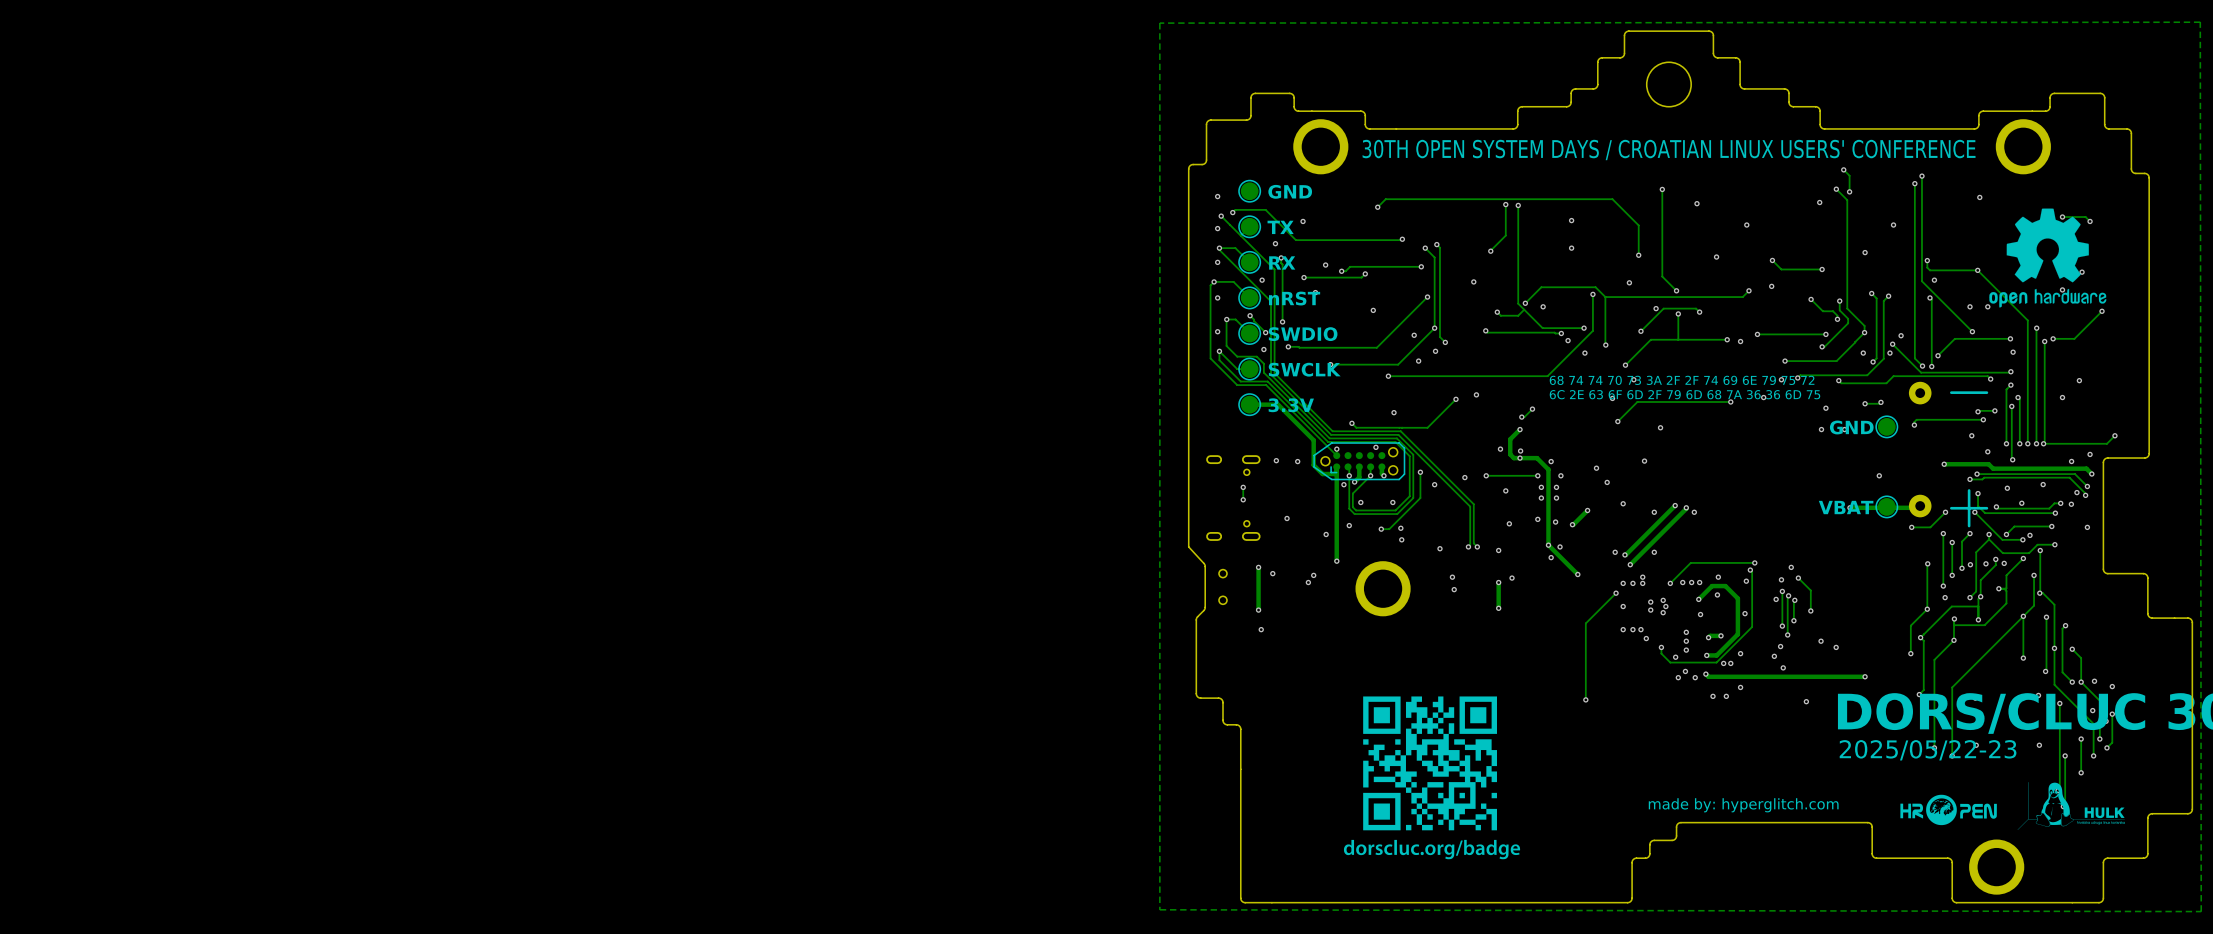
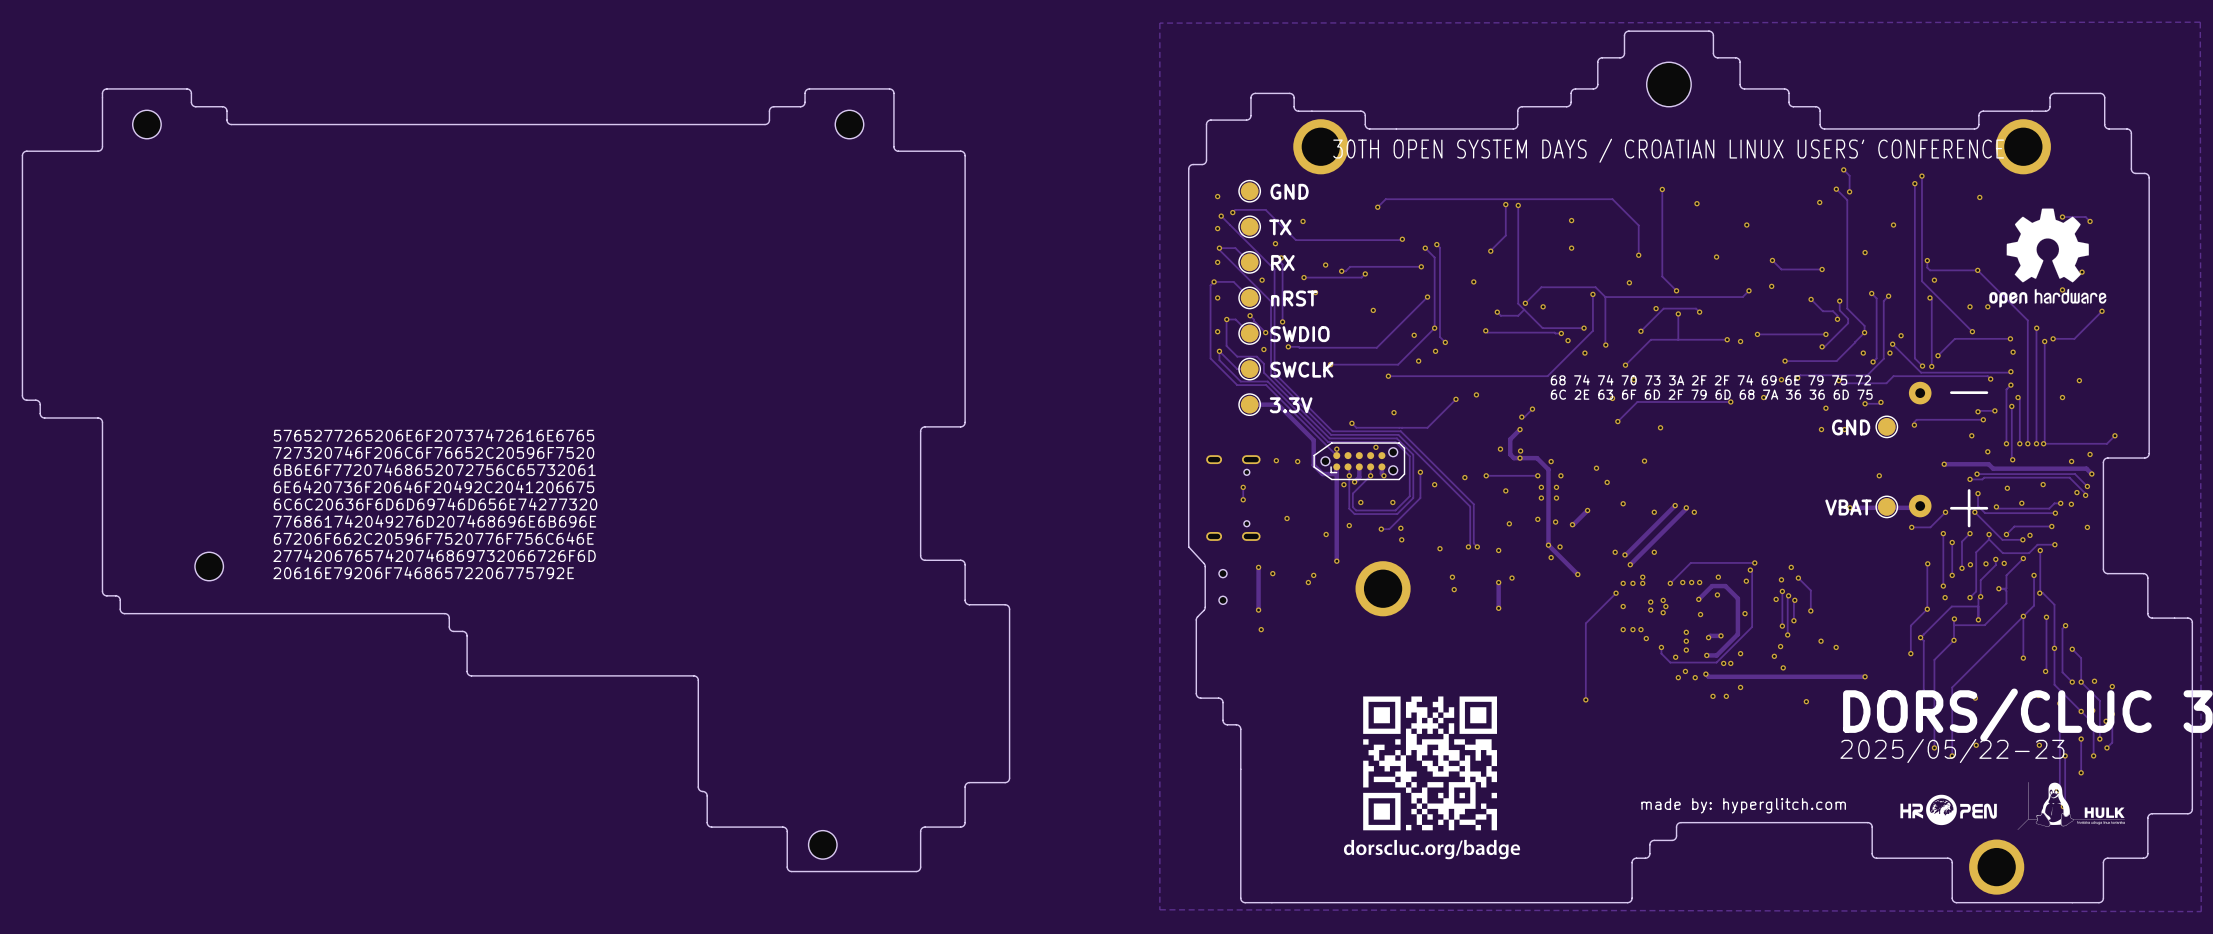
board edge: none -> (889, 88) (808, 89) (805, 92) (803, 105) (772, 107) (769, 110) (769, 121) (765, 124) (231, 124) (227, 121) (226, 110) (224, 107) (193, 105) (191, 92) (188, 89) (104, 89) (102, 92) (102, 146) (100, 150) (26, 151) (22, 155) (22, 396) (25, 400) (38, 401) (40, 414) (43, 417) (98, 417) (102, 420) (103, 593) (118, 597) (120, 610) (124, 613) (446, 613) (449, 616) (450, 630) (463, 631) (466, 634) (467, 672) (470, 675) (695, 676) (698, 680) (698, 787) (707, 794) (707, 822) (708, 826) (785, 827) (787, 831) (787, 867) (790, 871) (918, 870) (920, 867) (921, 828) (962, 826) (965, 823) (966, 783) (1005, 782) (1009, 779) (1009, 609) (1005, 604) (966, 603) (965, 564) (962, 560) (924, 560) (920, 556) (920, 430) (924, 426) (961, 426) (965, 423) (965, 155) (961, 151) (895, 150) (893, 146) (893, 92) (889, 88)
part: none -> (146, 124)
part: none -> (849, 124)
text: none -> 5765277265206E6F20737472616E6765 (434, 435)
text: none -> 727320746F206C6F76652C20596F7520 (433, 452)
text: none -> 6B6E6F77207468652072756C65732061 (434, 469)
text: none -> 6E6420736F20646F20492C2041206675 (434, 487)
text: none -> 6C6C20636F6D6D69746D656E74277320 (435, 504)
text: none -> 776861742049276D207468696E6B696E (434, 521)
text: none -> 67206F662C20596F7520776F756C646E (433, 538)
text: none -> 27742067657420746869732066726F6D (434, 555)
part: none -> (209, 566)
text: none -> 20616E79206F74686572206775792E (423, 572)
part: none -> (822, 844)

